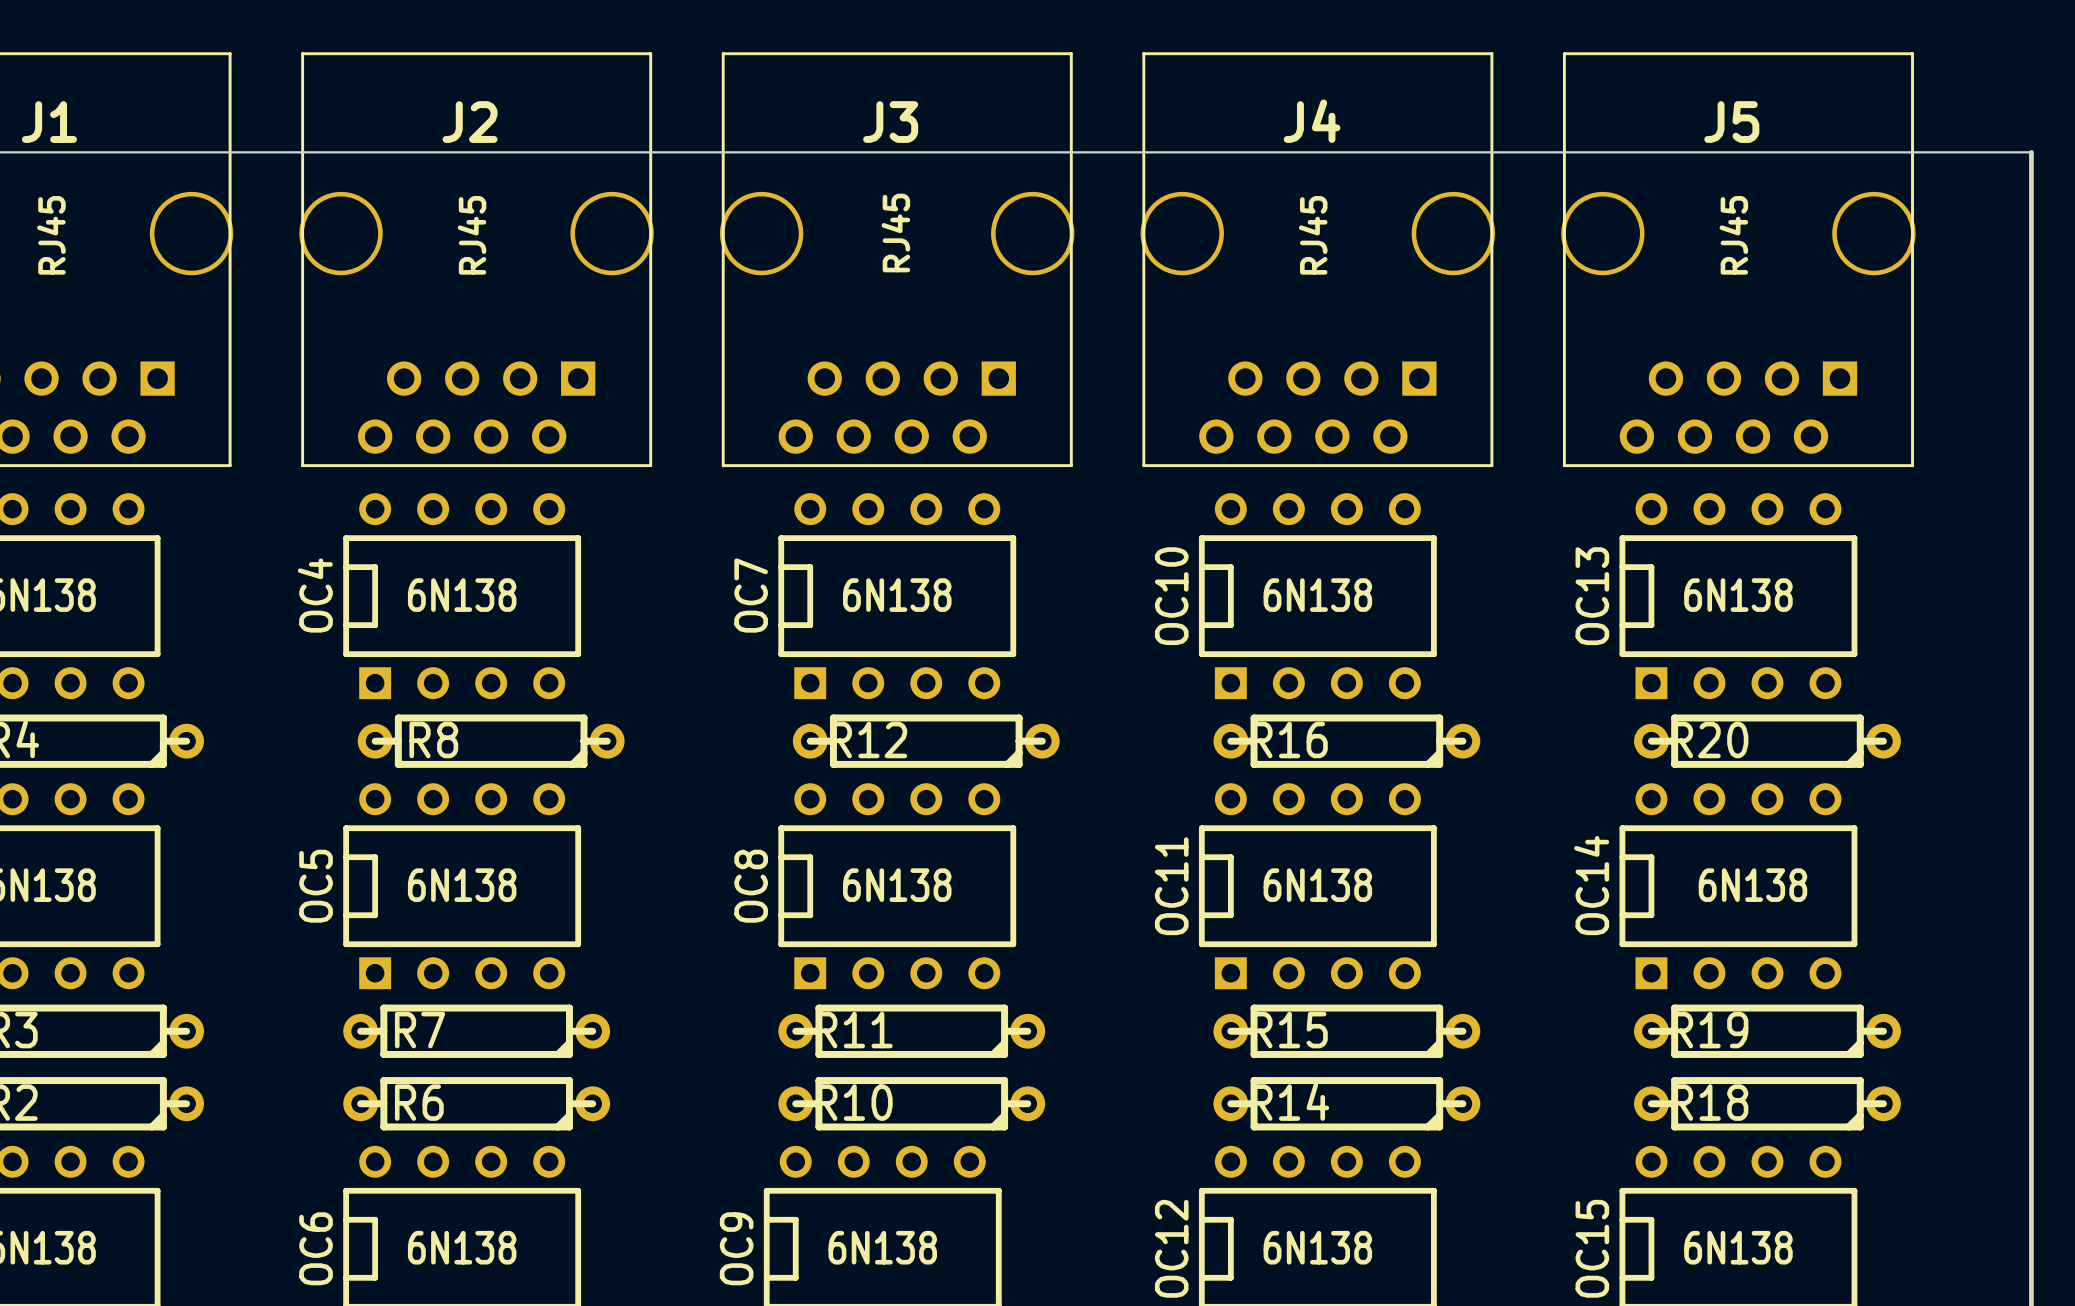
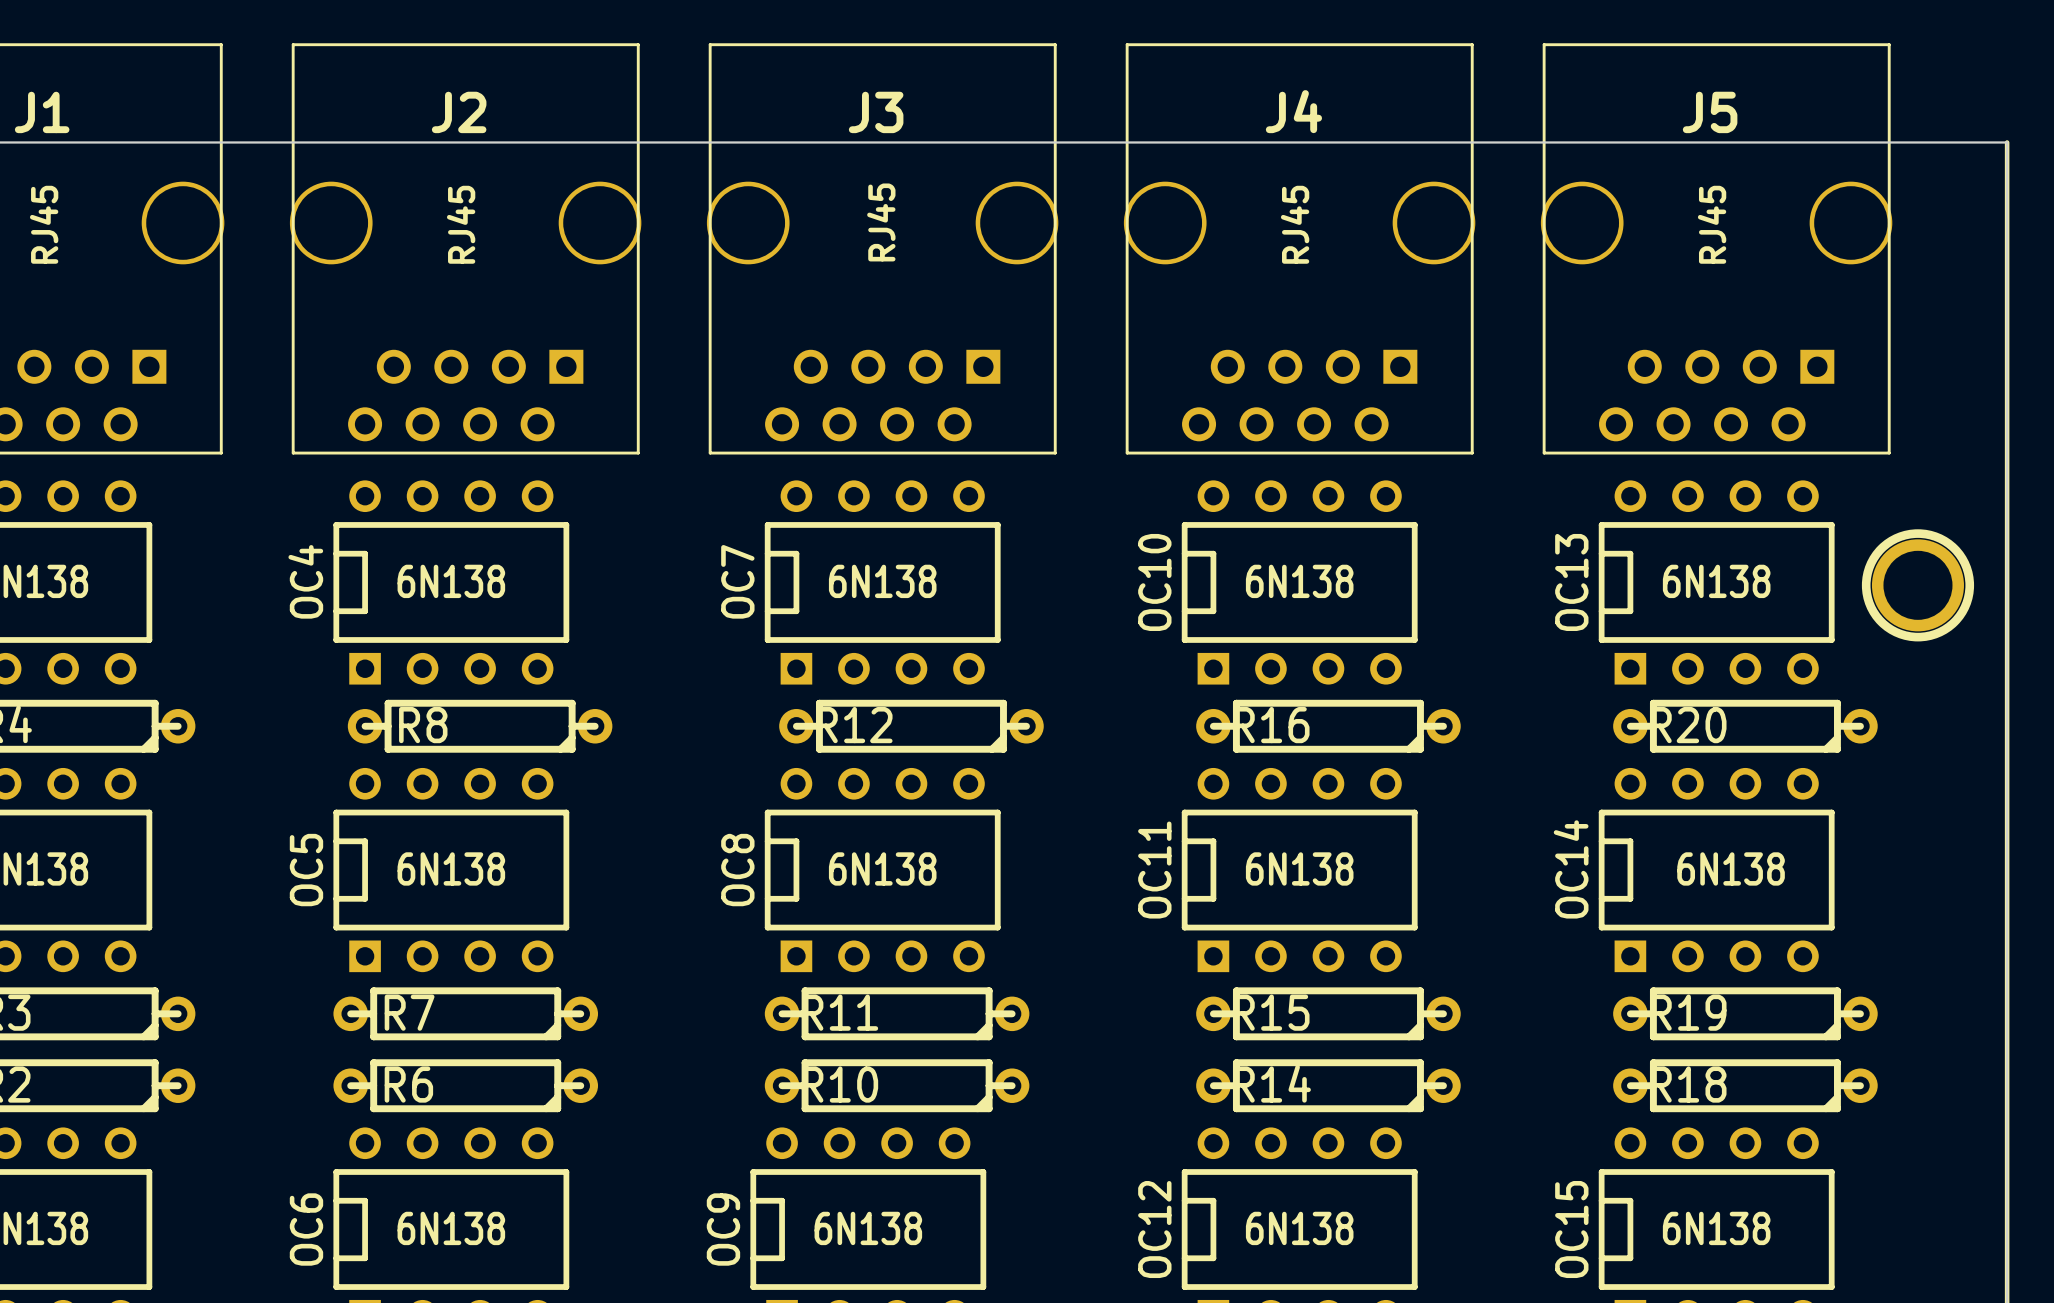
part: none -> (1917, 585)

